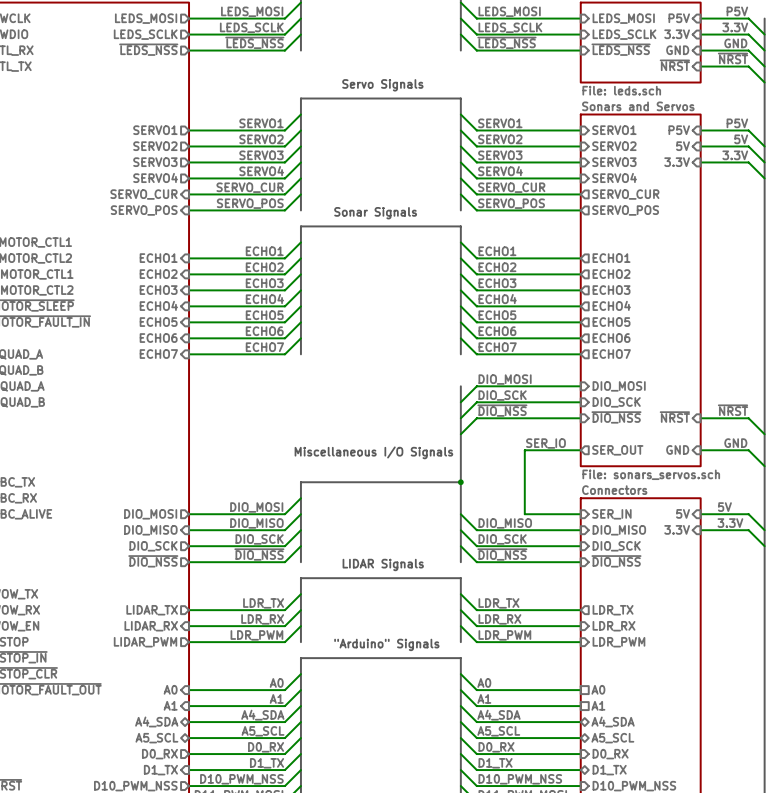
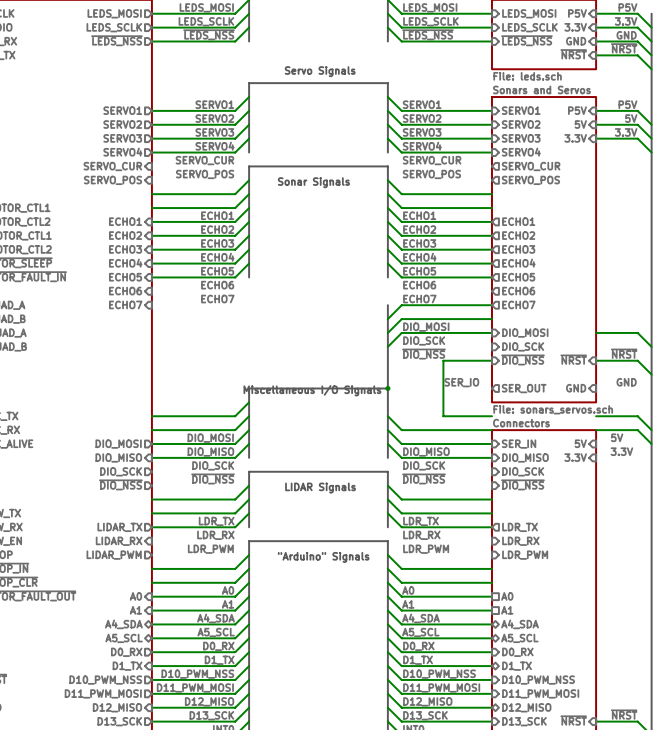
wire: (300, 178) (284, 194) (189, 194) -> (249, 180) (235, 194) (151, 194)
bus: (300, 178) (300, 194) -> (387, 166) (249, 166)
wire: (460, 178) (476, 194) (580, 194) -> (387, 180) (401, 194) (491, 194)
bus: (460, 178) (460, 194) -> (387, 180) (387, 194)
wire: (300, 194) (284, 210) (189, 210) -> (249, 194) (235, 208) (151, 208)
wire: (460, 194) (476, 210) (580, 210) -> (387, 194) (401, 208) (491, 208)
bus: (300, 226) (460, 226) -> (249, 194) (249, 180)
wire: (300, 322) (284, 338) (189, 338) -> none
bus: (300, 322) (300, 354) -> none
wire: (460, 322) (476, 338) (580, 338) -> none
bus: (460, 322) (460, 354) -> (387, 332) (387, 305)
wire: (300, 338) (284, 354) (189, 354) -> (249, 402) (235, 416) (151, 416)
wire: (460, 338) (476, 354) -> (387, 319) (401, 305)
wire: (580, 402) (476, 402) (460, 418) -> (491, 319) (401, 319) (387, 332)
wire: (524, 418) (476, 418) (460, 434) -> none
wire: (524, 450) (580, 450) -> (443, 388) (443, 360)
wire: (700, 450) (748, 450) (764, 466) -> (596, 416) (637, 416) (651, 430)
wire: none -> (249, 416) (235, 430) (151, 430)
bus: (300, 482) (460, 482) -> (249, 416) (249, 388) (387, 388)
wire: none -> (387, 416) (401, 430) (491, 430)
junction position: (460, 482) -> (387, 388)
wire: (524, 482) (524, 514) -> (443, 416) (491, 416)
wire: none -> (387, 430) (401, 444) (443, 444)
wire: (700, 514) (748, 514) (764, 530) -> (596, 332) (637, 332) (651, 346)
wire: (300, 530) (284, 546) (189, 546) -> (249, 485) (235, 499) (151, 499)
bus: (300, 530) (300, 546) -> (387, 471) (249, 471)
wire: (460, 530) (476, 546) (580, 546) -> (387, 485) (401, 499) (491, 499)
bus: (460, 530) (460, 546) -> (387, 485) (387, 499)
wire: (700, 530) (748, 530) (764, 546) -> (596, 430) (637, 430) (651, 444)
wire: (300, 546) (284, 562) (189, 562) -> (249, 499) (235, 513) (151, 513)
wire: (460, 546) (476, 562) (580, 562) -> (387, 499) (401, 513) (491, 513)
bus: (300, 578) (460, 578) -> (249, 499) (249, 485)
wire: (300, 610) (284, 626) (189, 626) -> (249, 555) (235, 568) (151, 568)
bus: (300, 610) (300, 626) -> (387, 541) (249, 541)
wire: (460, 610) (476, 626) (580, 626) -> (387, 555) (401, 568) (491, 568)
bus: (460, 610) (460, 626) -> (387, 555) (387, 568)
wire: (300, 626) (284, 642) (189, 642) -> (249, 568) (235, 582) (151, 582)
wire: (460, 626) (476, 642) (580, 642) -> (387, 568) (401, 582) (491, 582)
bus: (300, 658) (460, 658) -> (249, 568) (249, 555)

